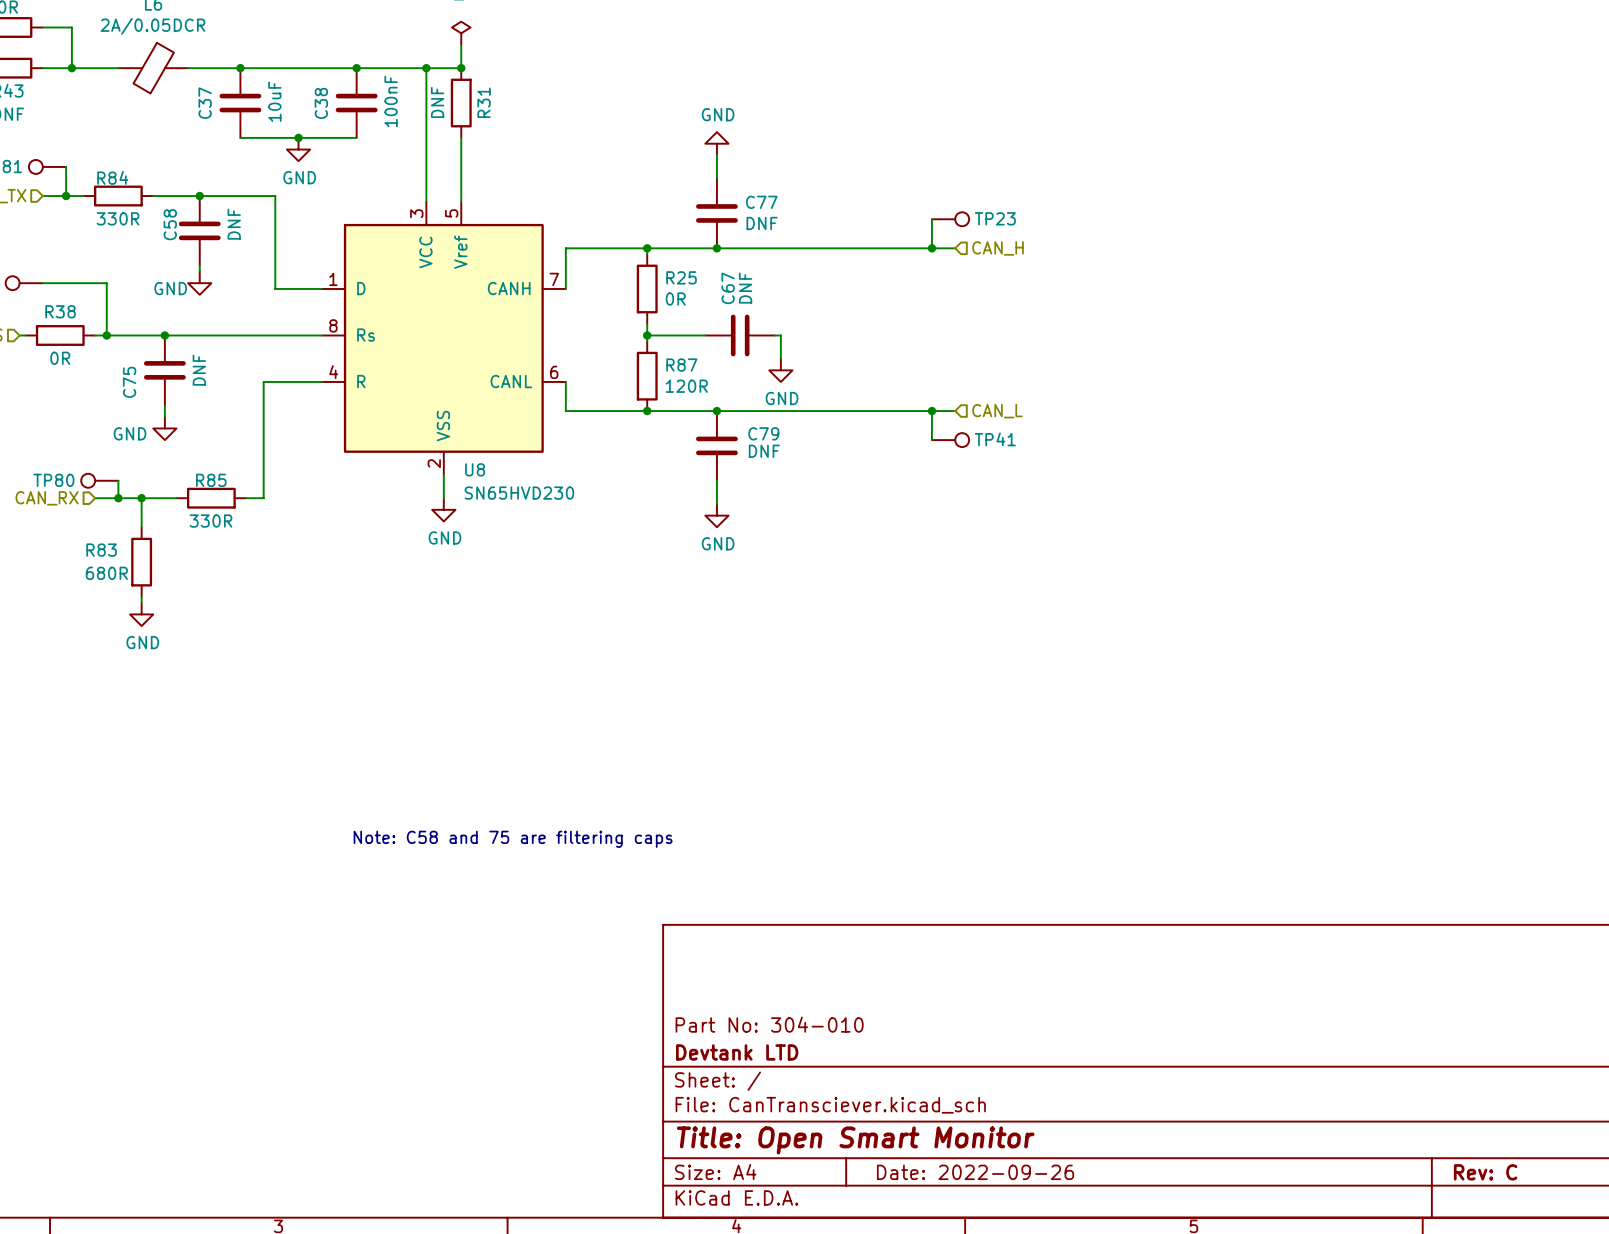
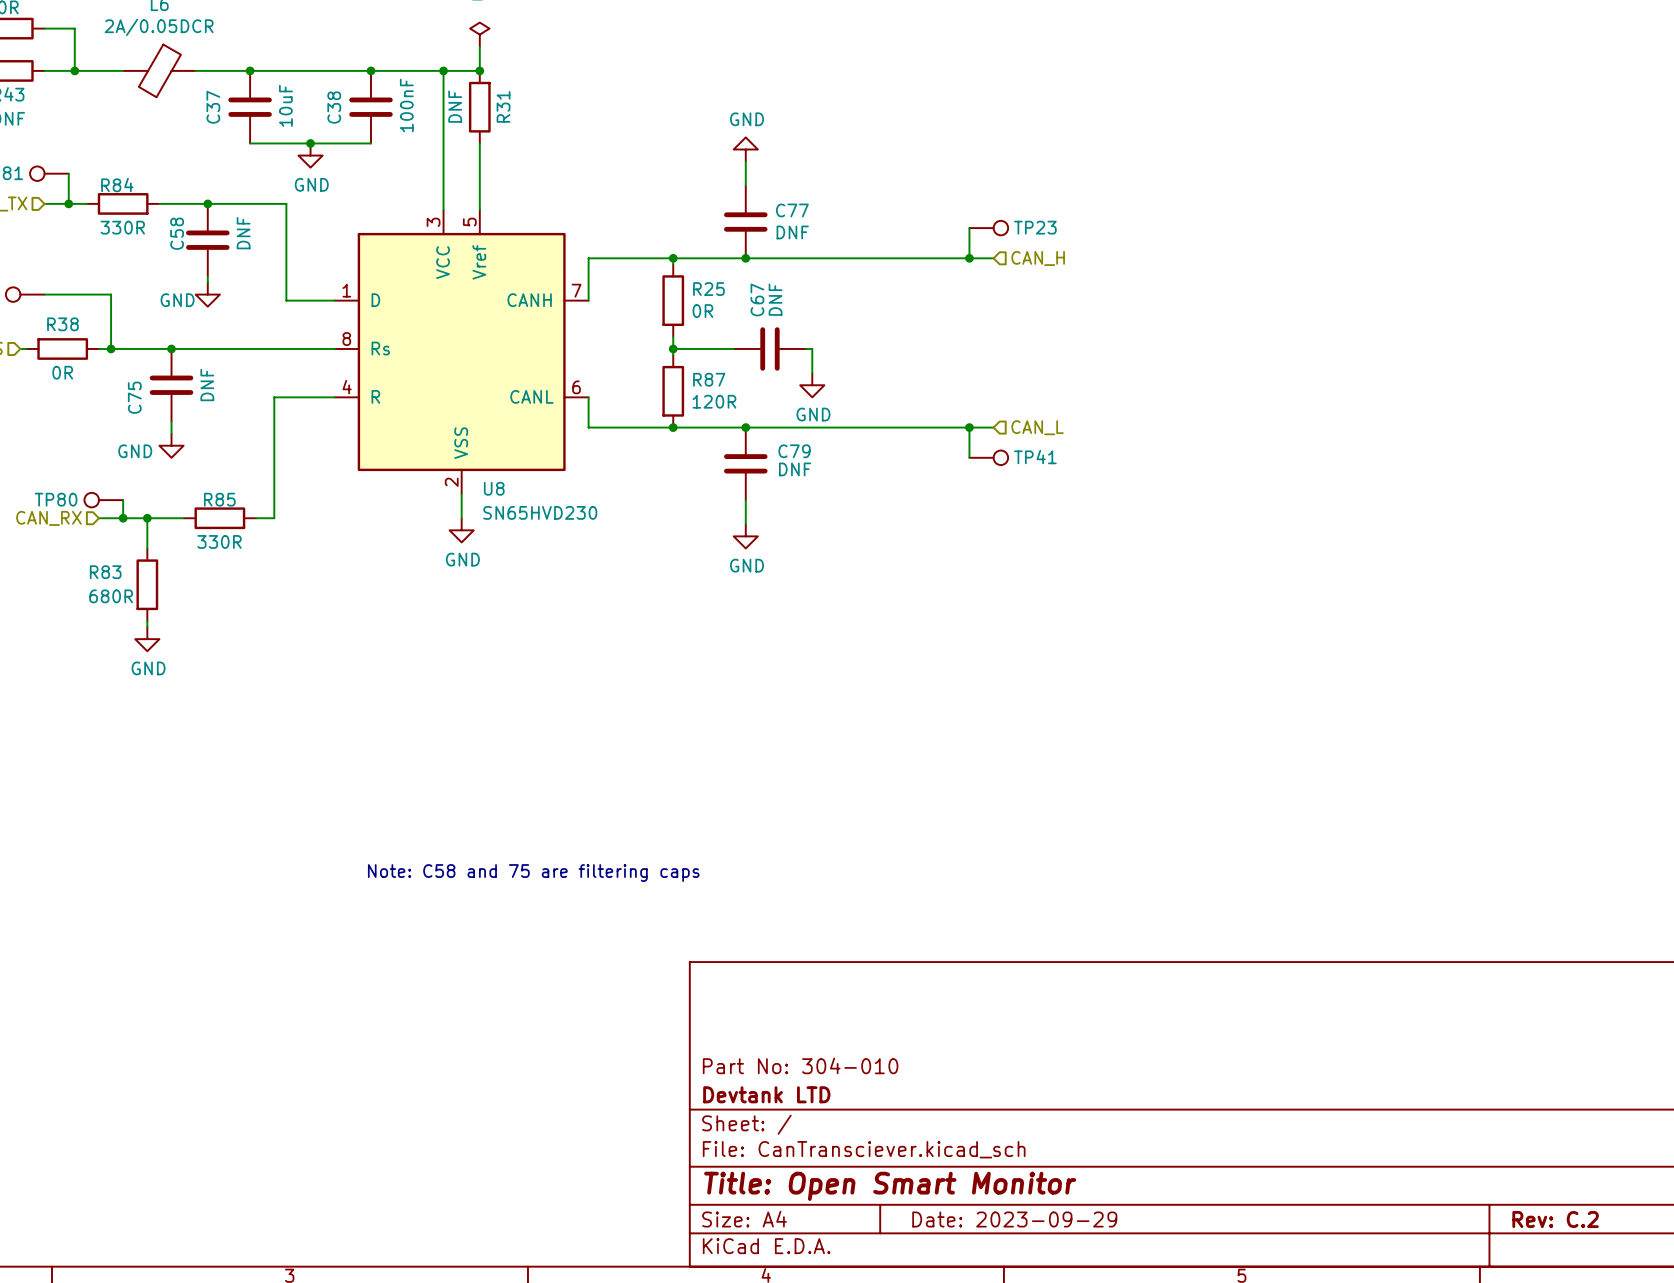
title block: Date: 2022-09-26 (975, 1172) -> Date: 2023-09-29 (1014, 1219)
title block: Rev: C (1485, 1172) -> Rev: C.2 (1555, 1219)

